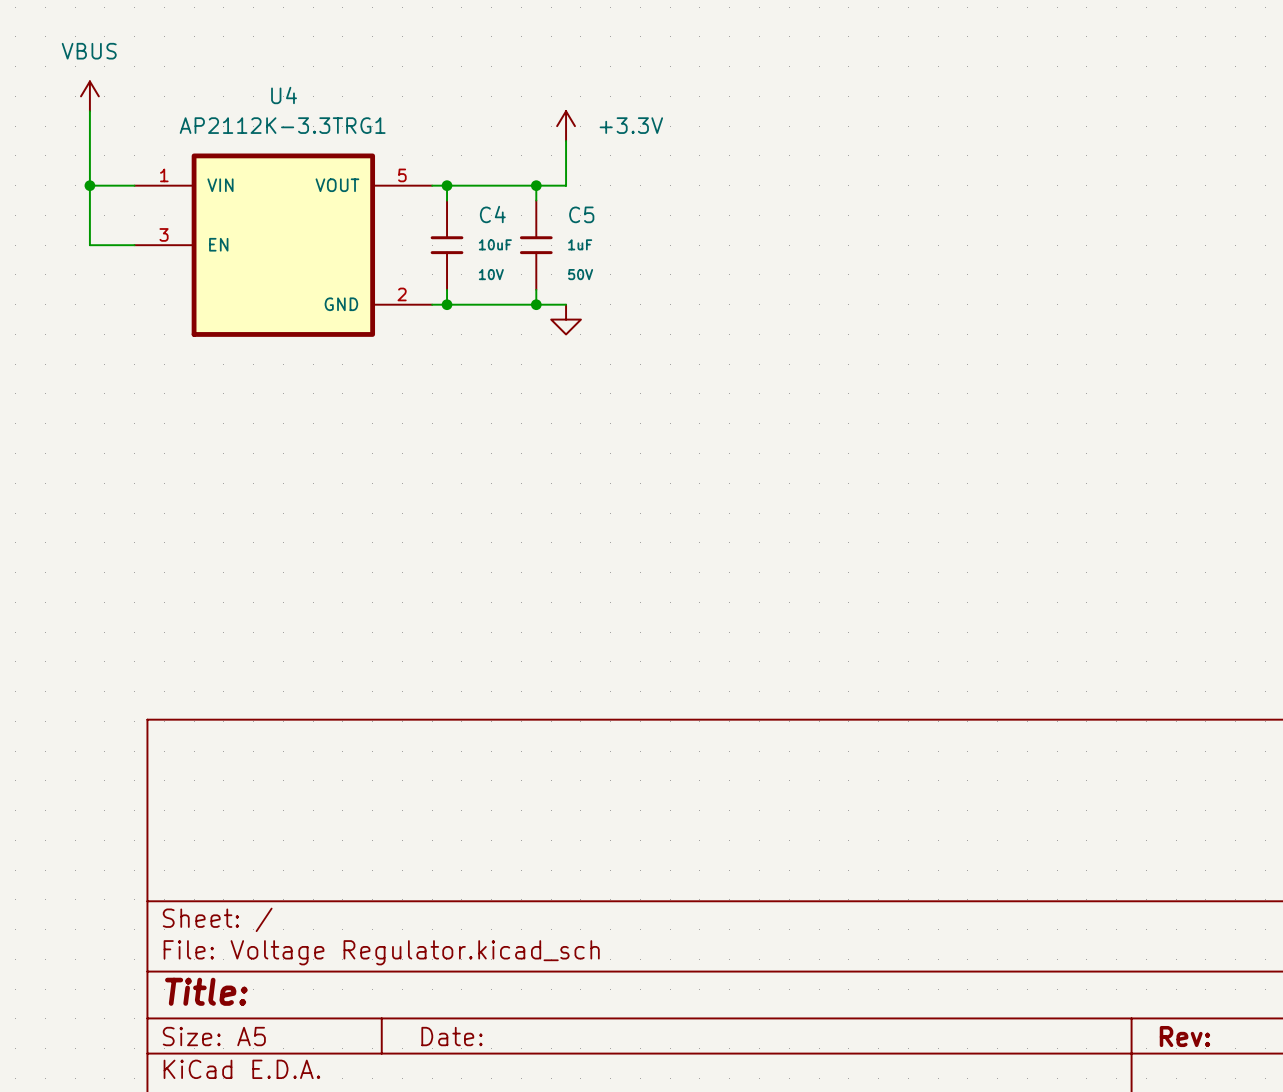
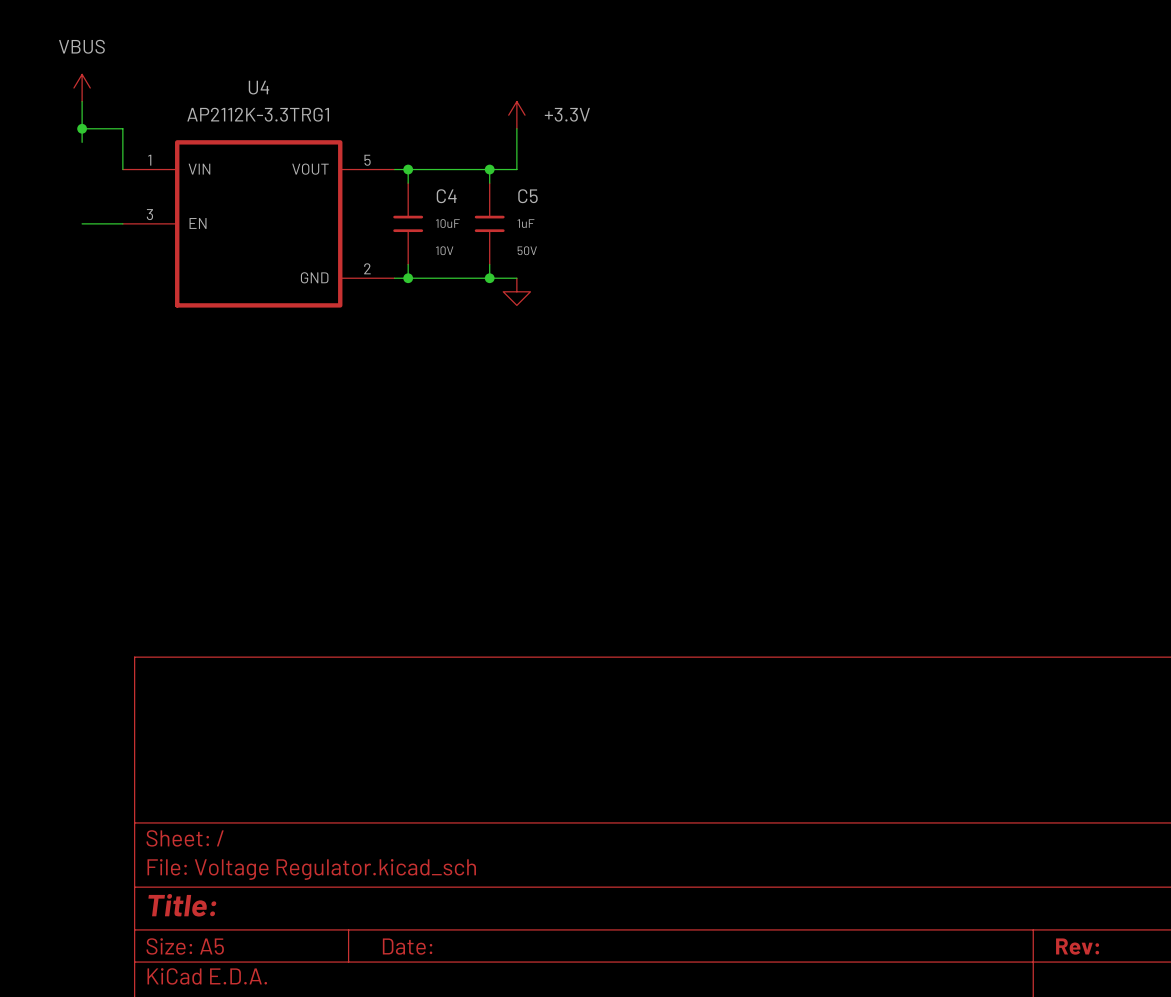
wire: (89, 155) (89, 245) -> none
wire: (89, 185) (134, 185) -> (82, 128) (122, 128) (122, 169)
junction position: (89, 185) -> (82, 128)

